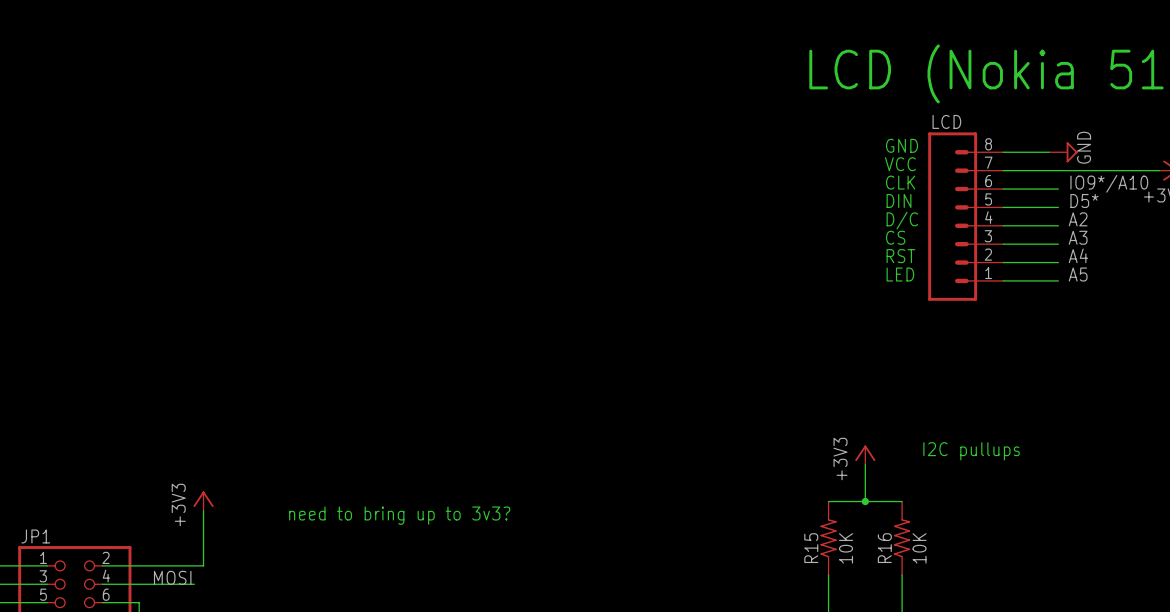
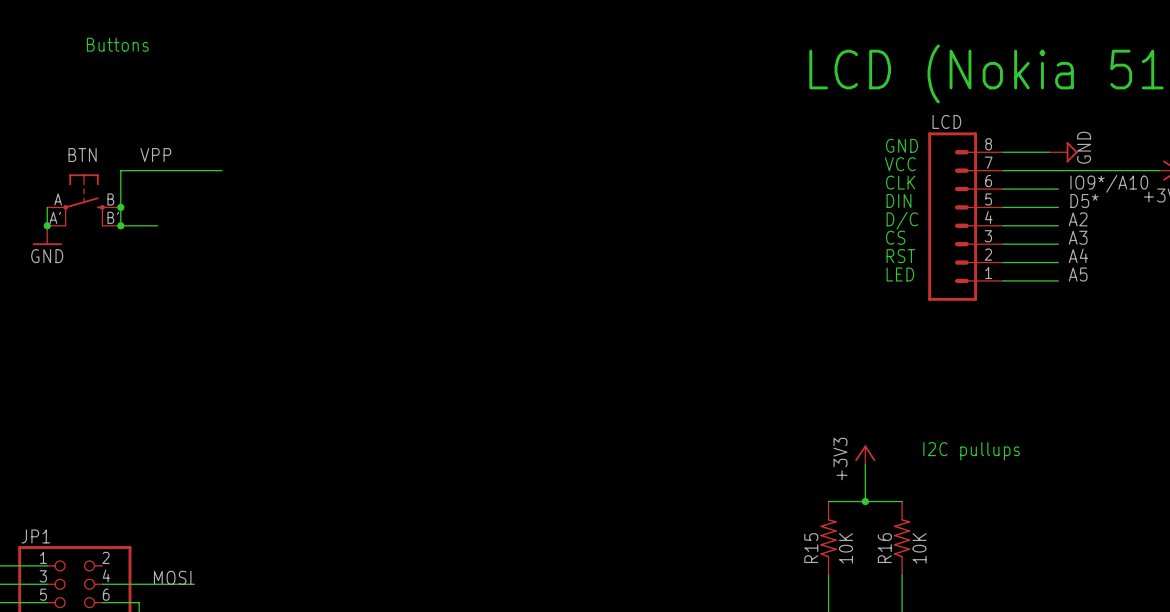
text: none -> Buttons (117, 44)
label: none -> VPP (155, 155)
wire: none -> (221, 170) (120, 170) (120, 225) (157, 225)
BTN: none -> (84, 200)
wire: none -> (47, 207) (47, 225)
junction: none -> (120, 207)
junction: none -> (47, 225)
junction: none -> (120, 225)
power symbol: none -> GND (47, 235)
power symbol: +3V3 (203, 501) -> none
wire: (203, 510) (203, 565) (102, 565) -> none
text: need to bring up to 3v3? (399, 515) -> none

